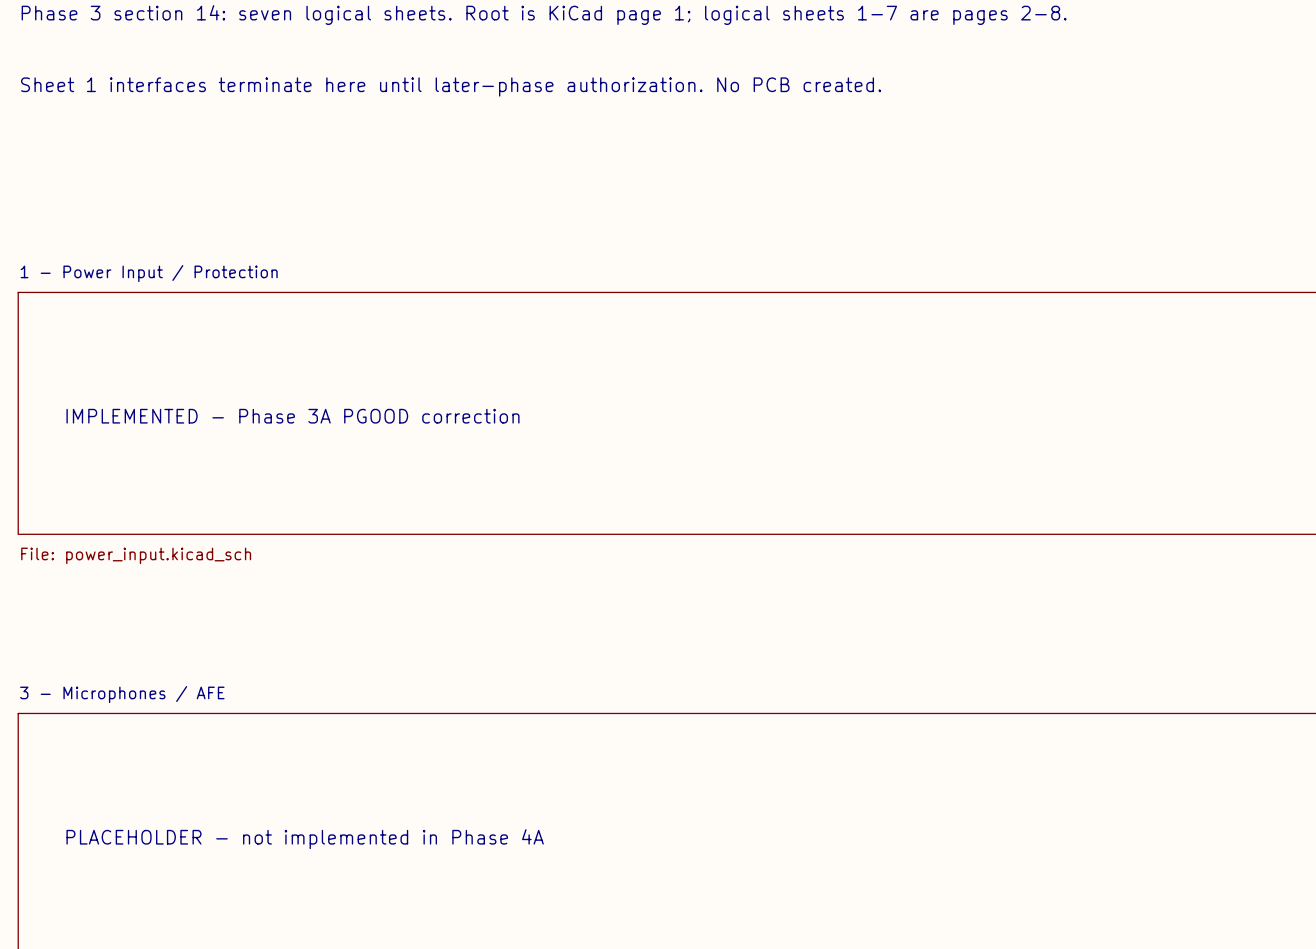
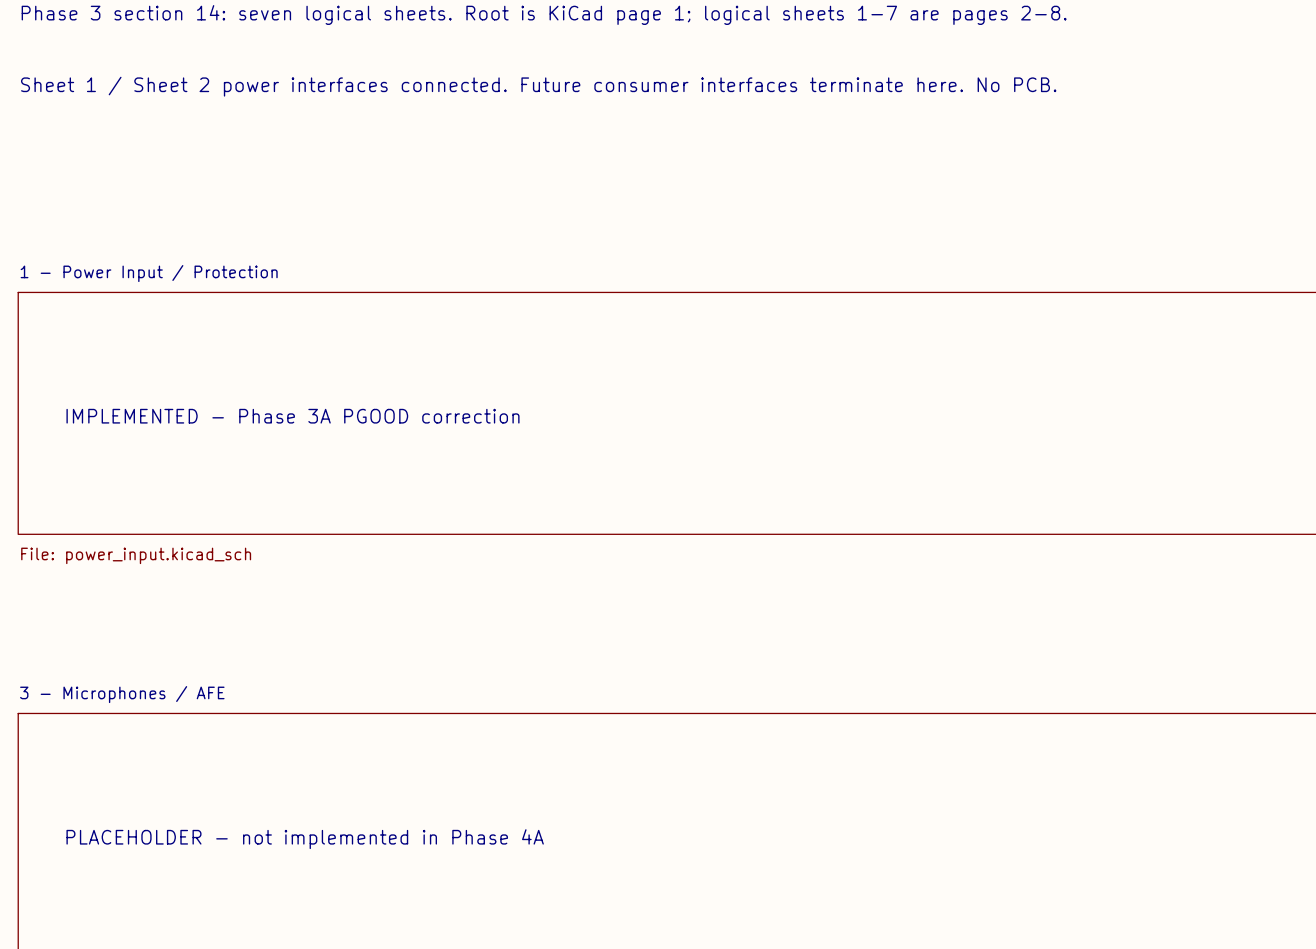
text: Sheet 1 interfaces terminate here until later-phase authorization. No PCB created. (451, 86) -> Sheet 1 / Sheet 2 power interfaces connected. Future consumer interfaces terminate here. No PCB. (538, 86)

